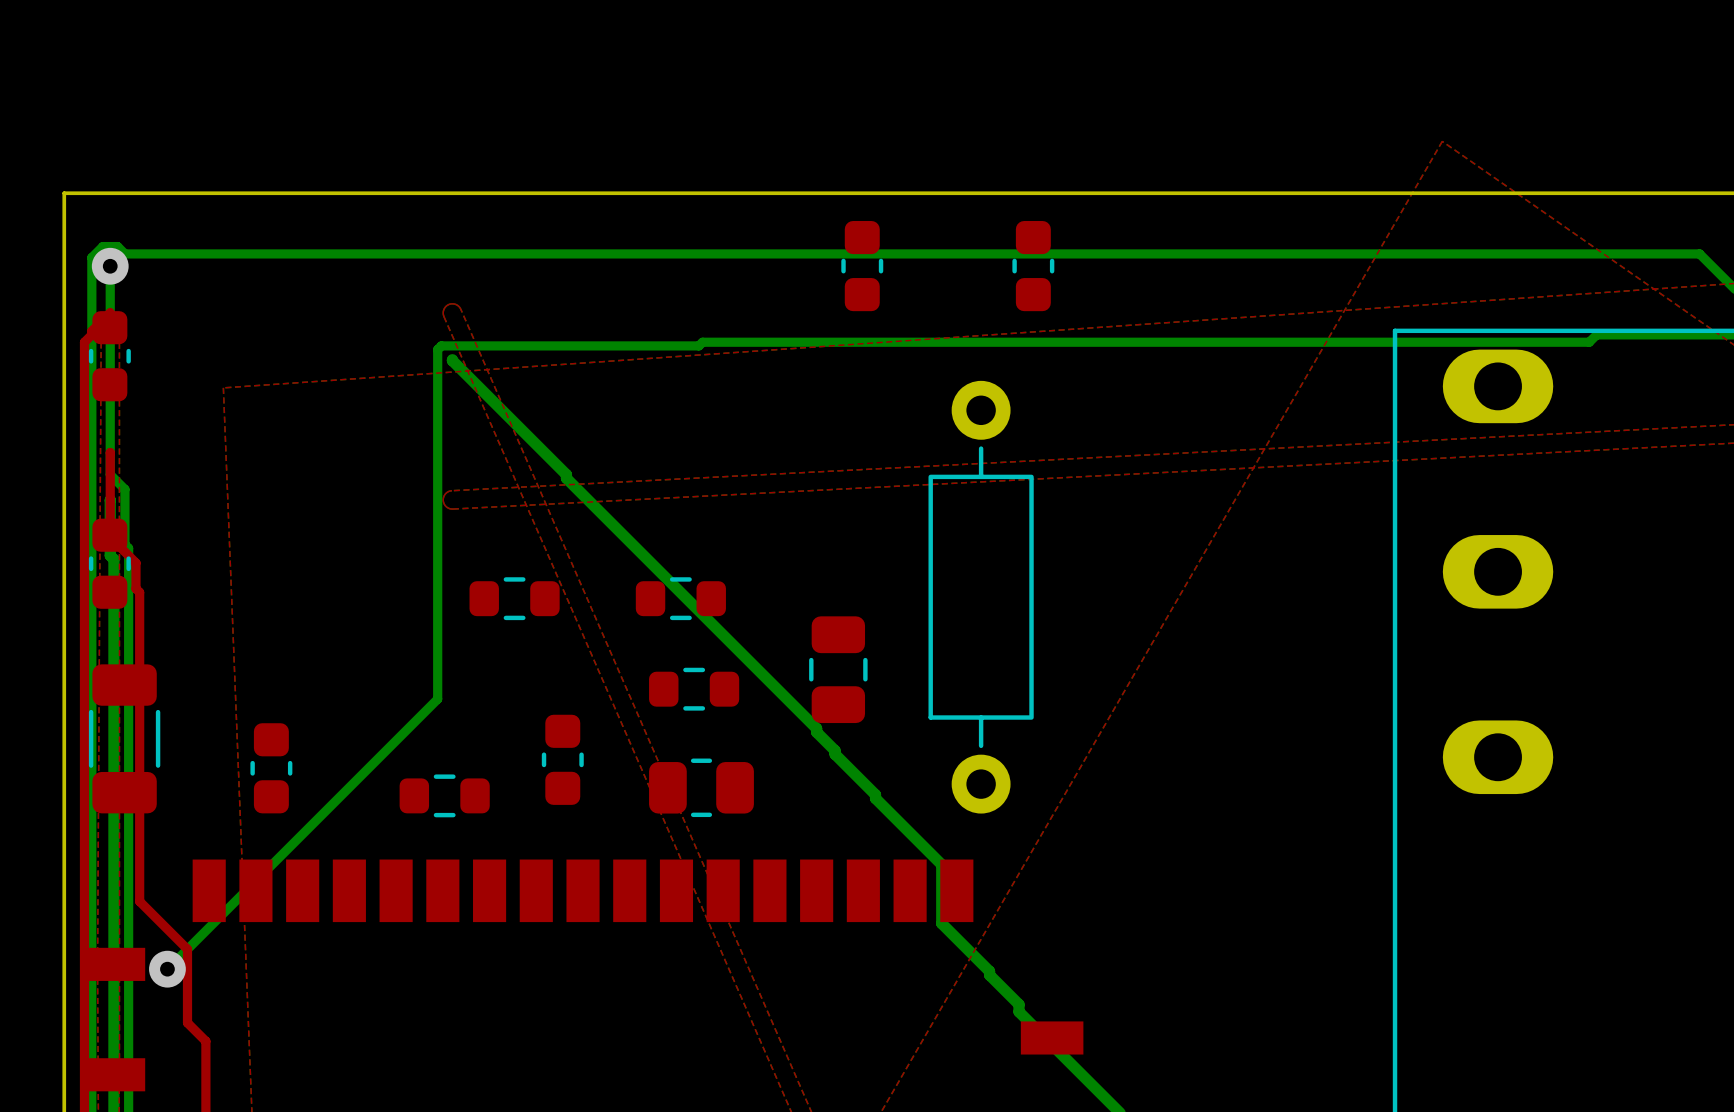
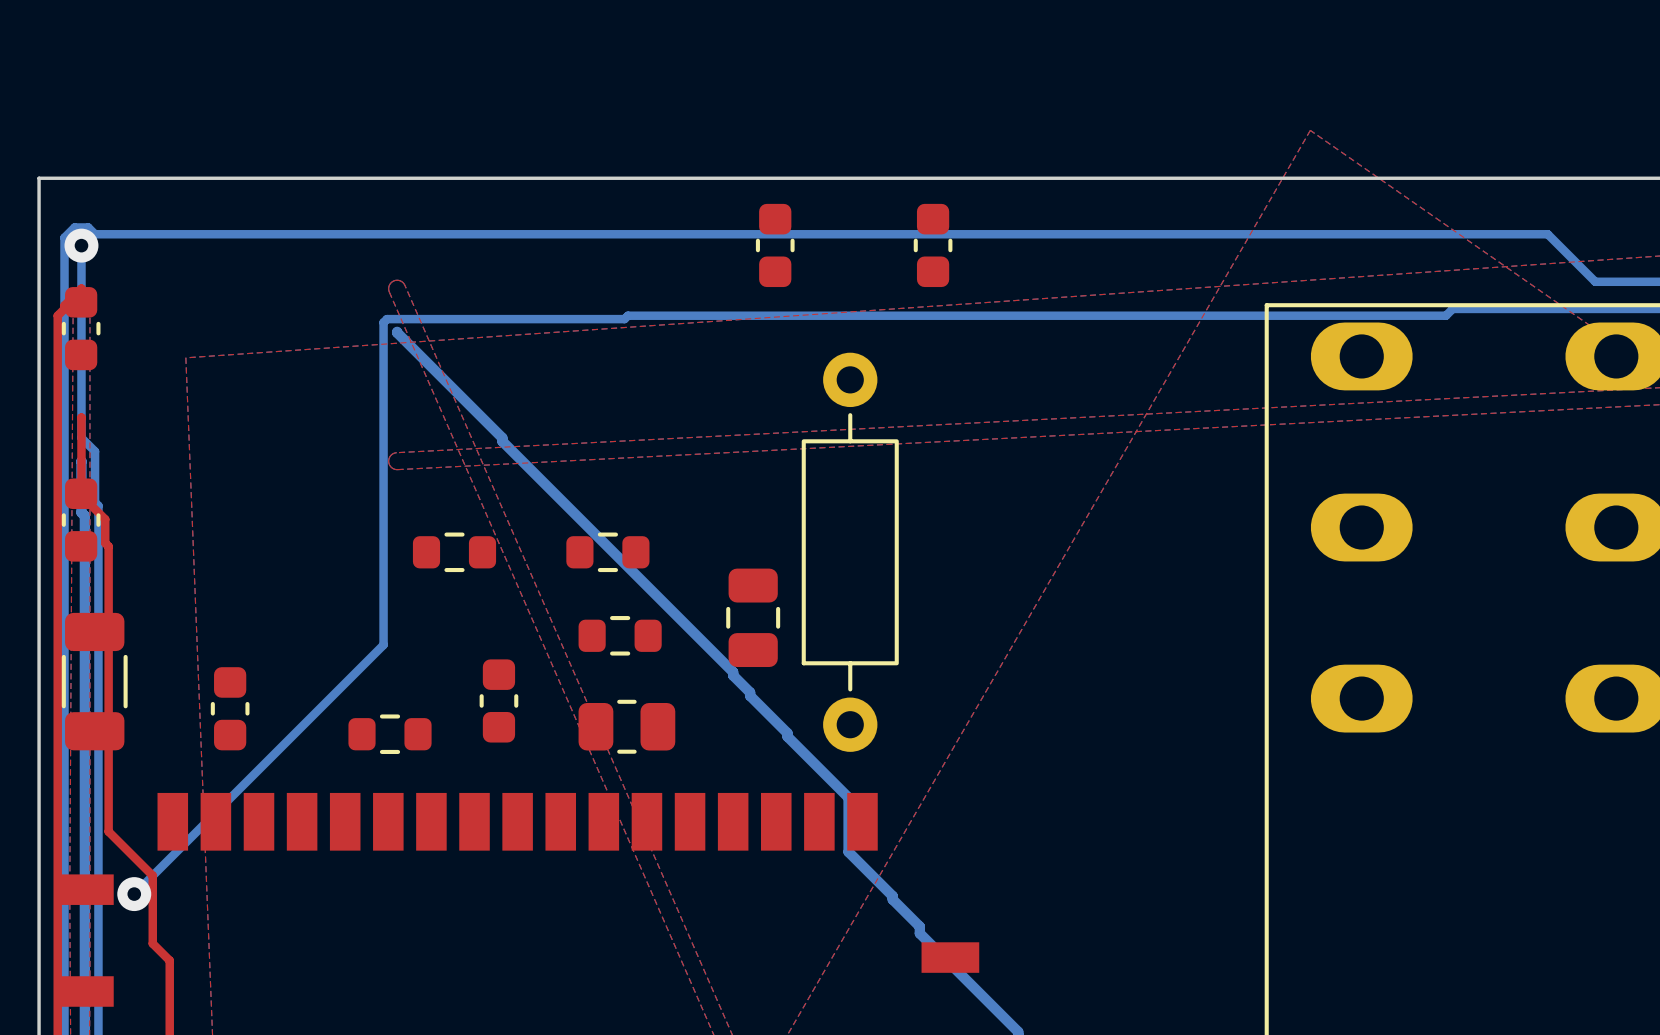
part position: (981, 597) -> (850, 552)

